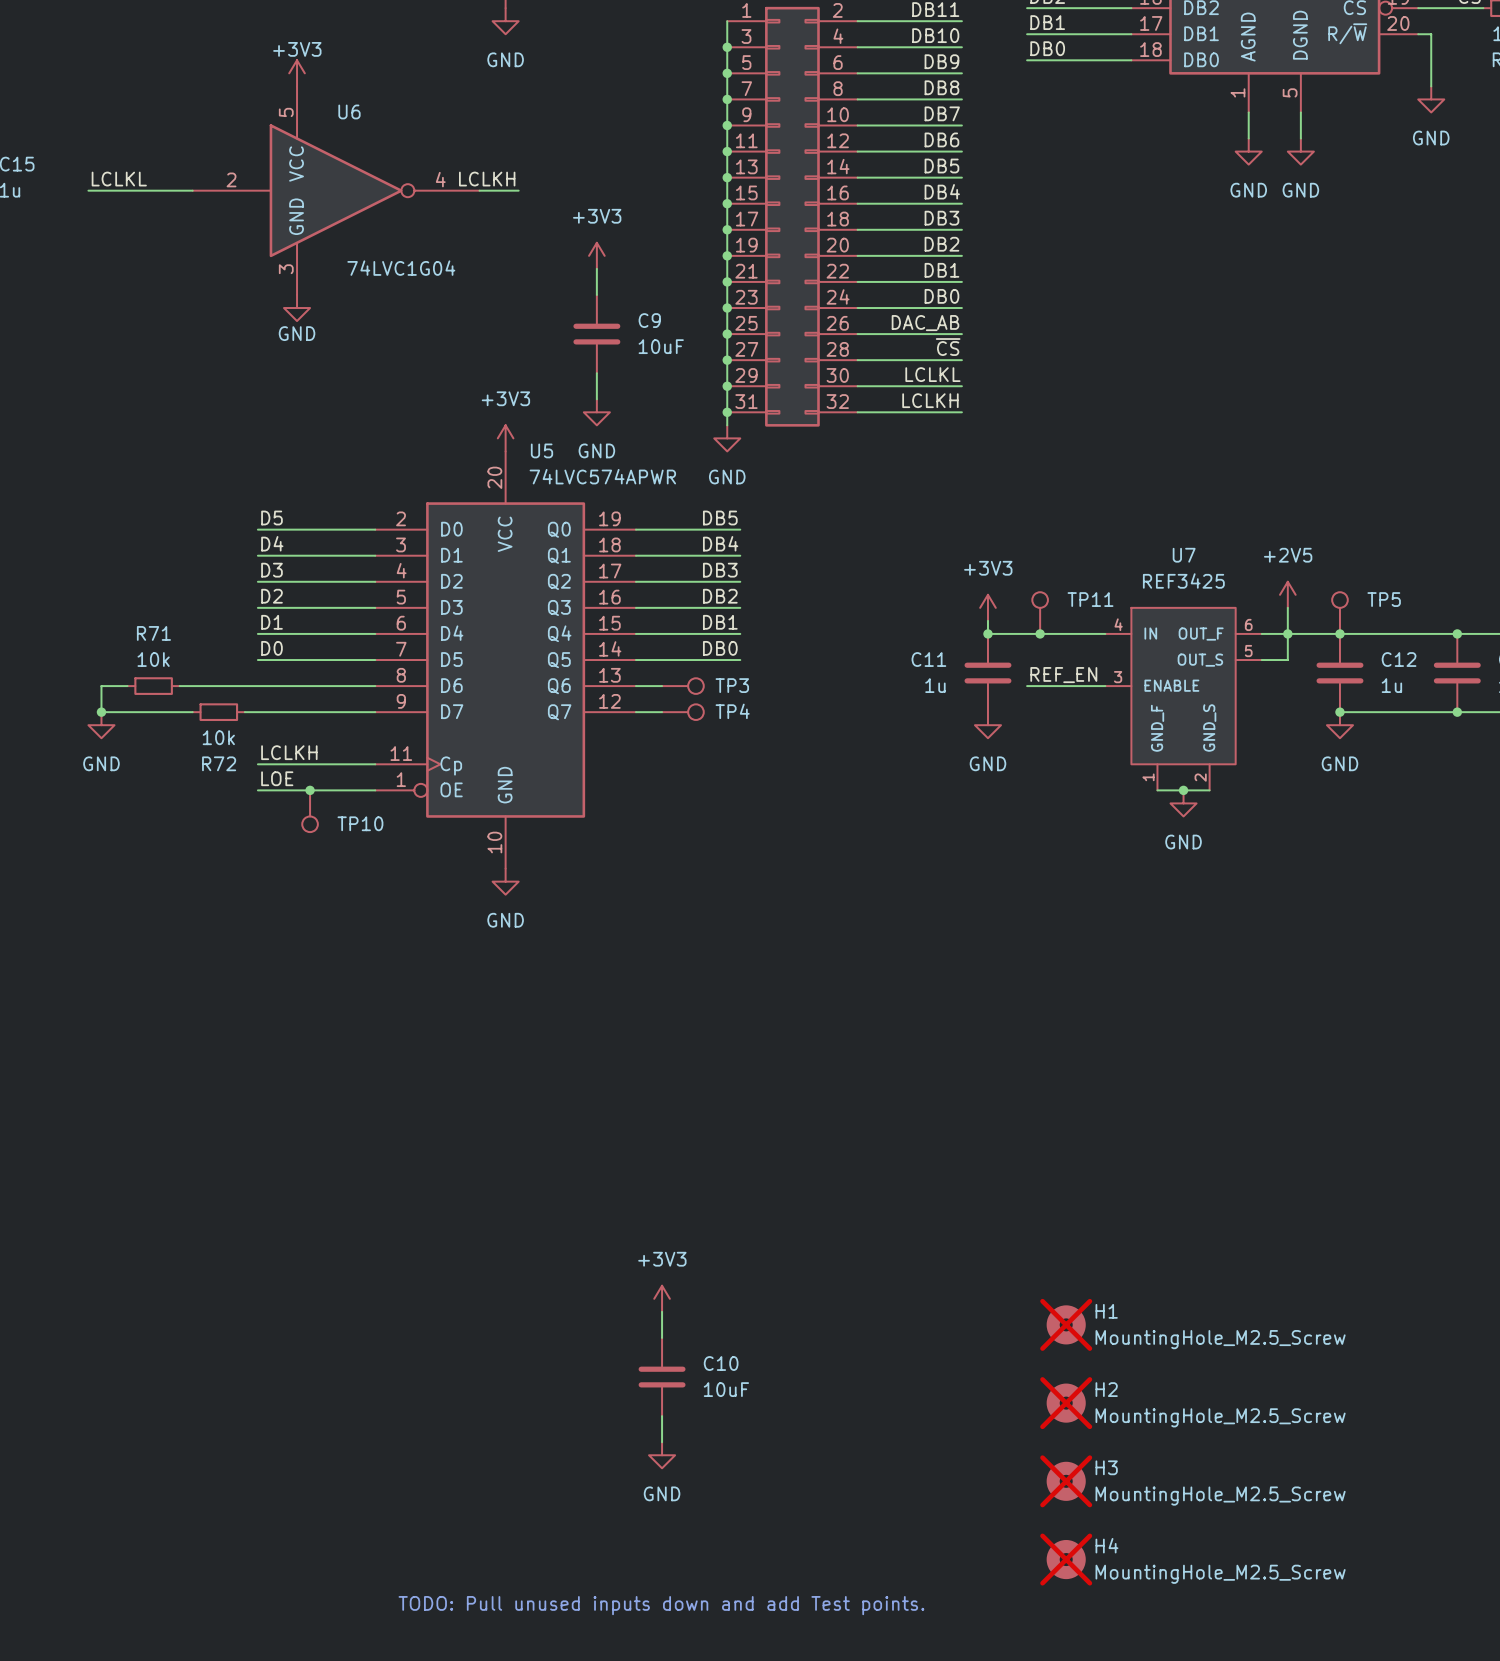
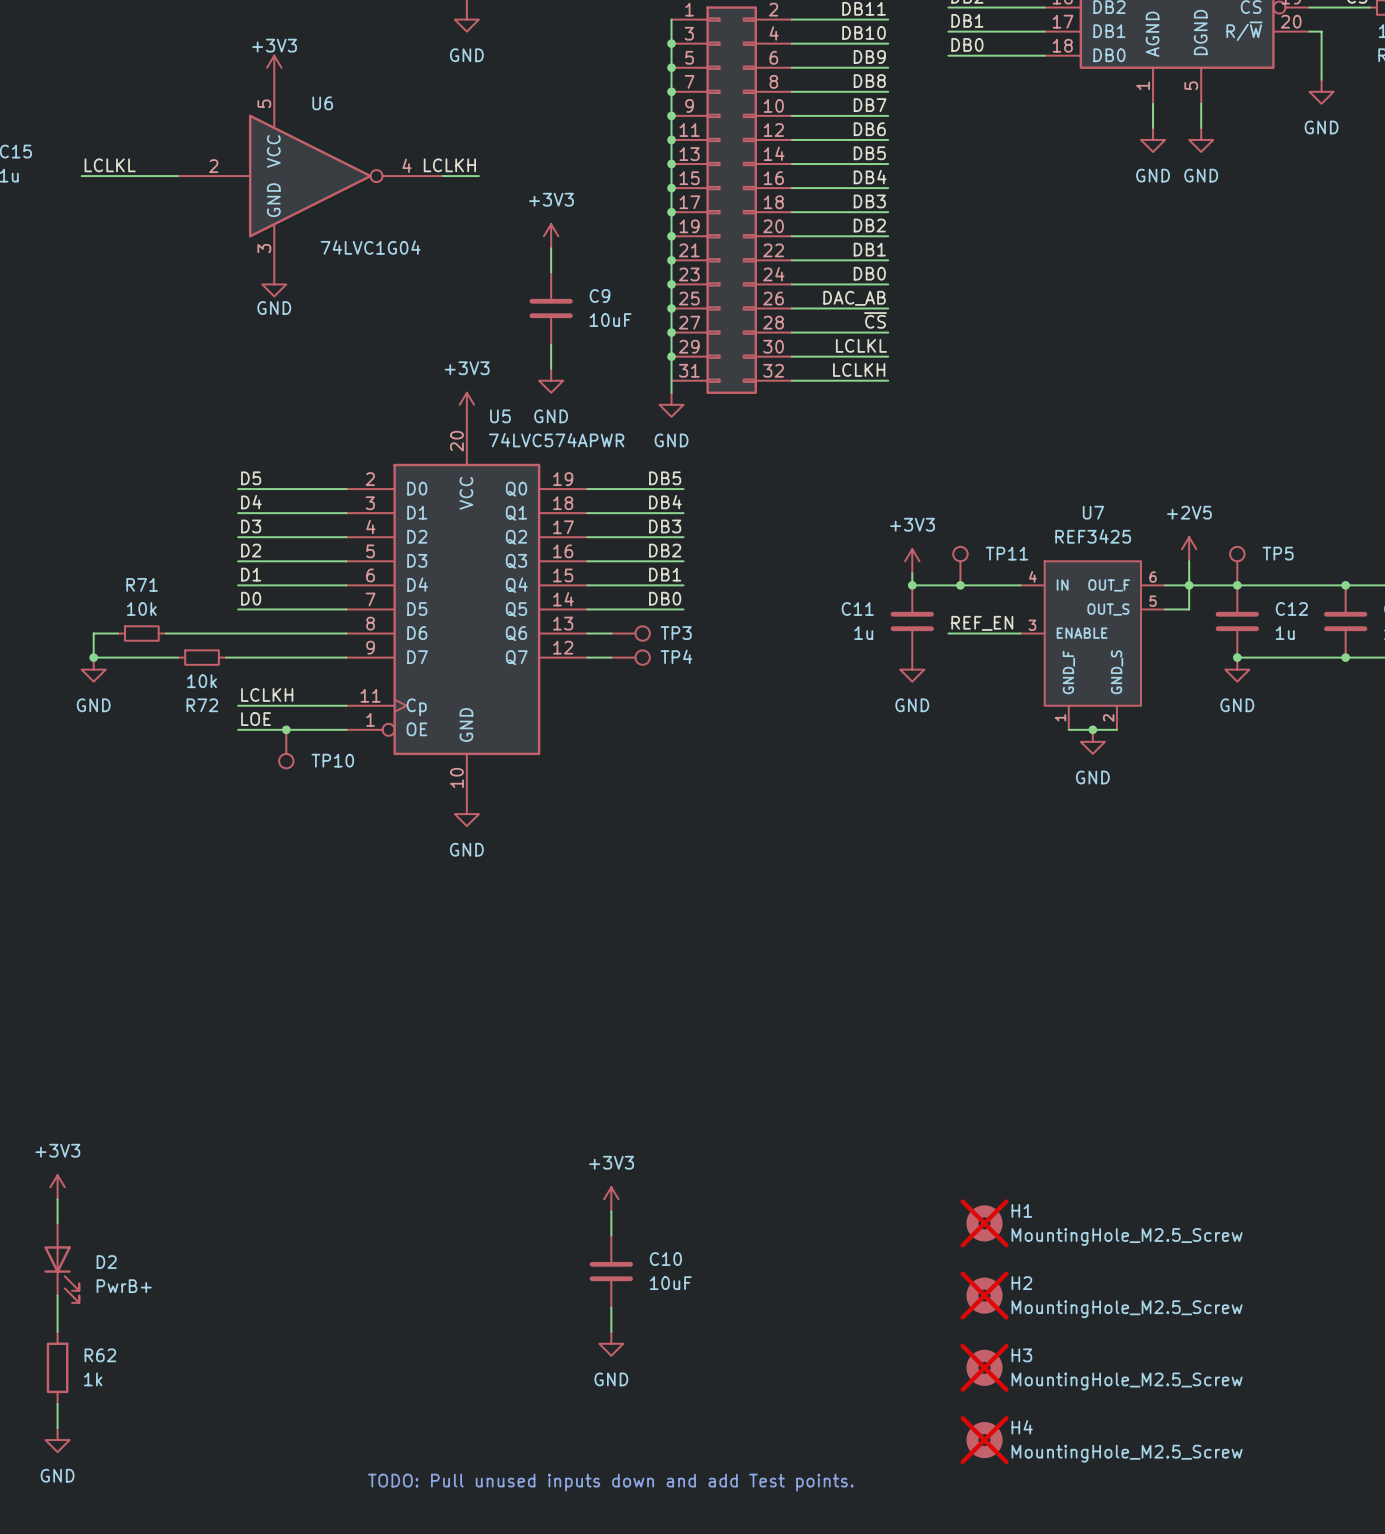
junction: (727, 412) -> none
power symbol: none -> +3V3 (57, 1187)
wire: none -> (57, 1199) (57, 1223)
D2: none -> PwrB+ (61, 1263)
wire: none -> (57, 1295) (57, 1331)
R62: none -> 1k (57, 1367)
wire: none -> (57, 1403) (57, 1428)
power symbol: none -> GND (57, 1440)

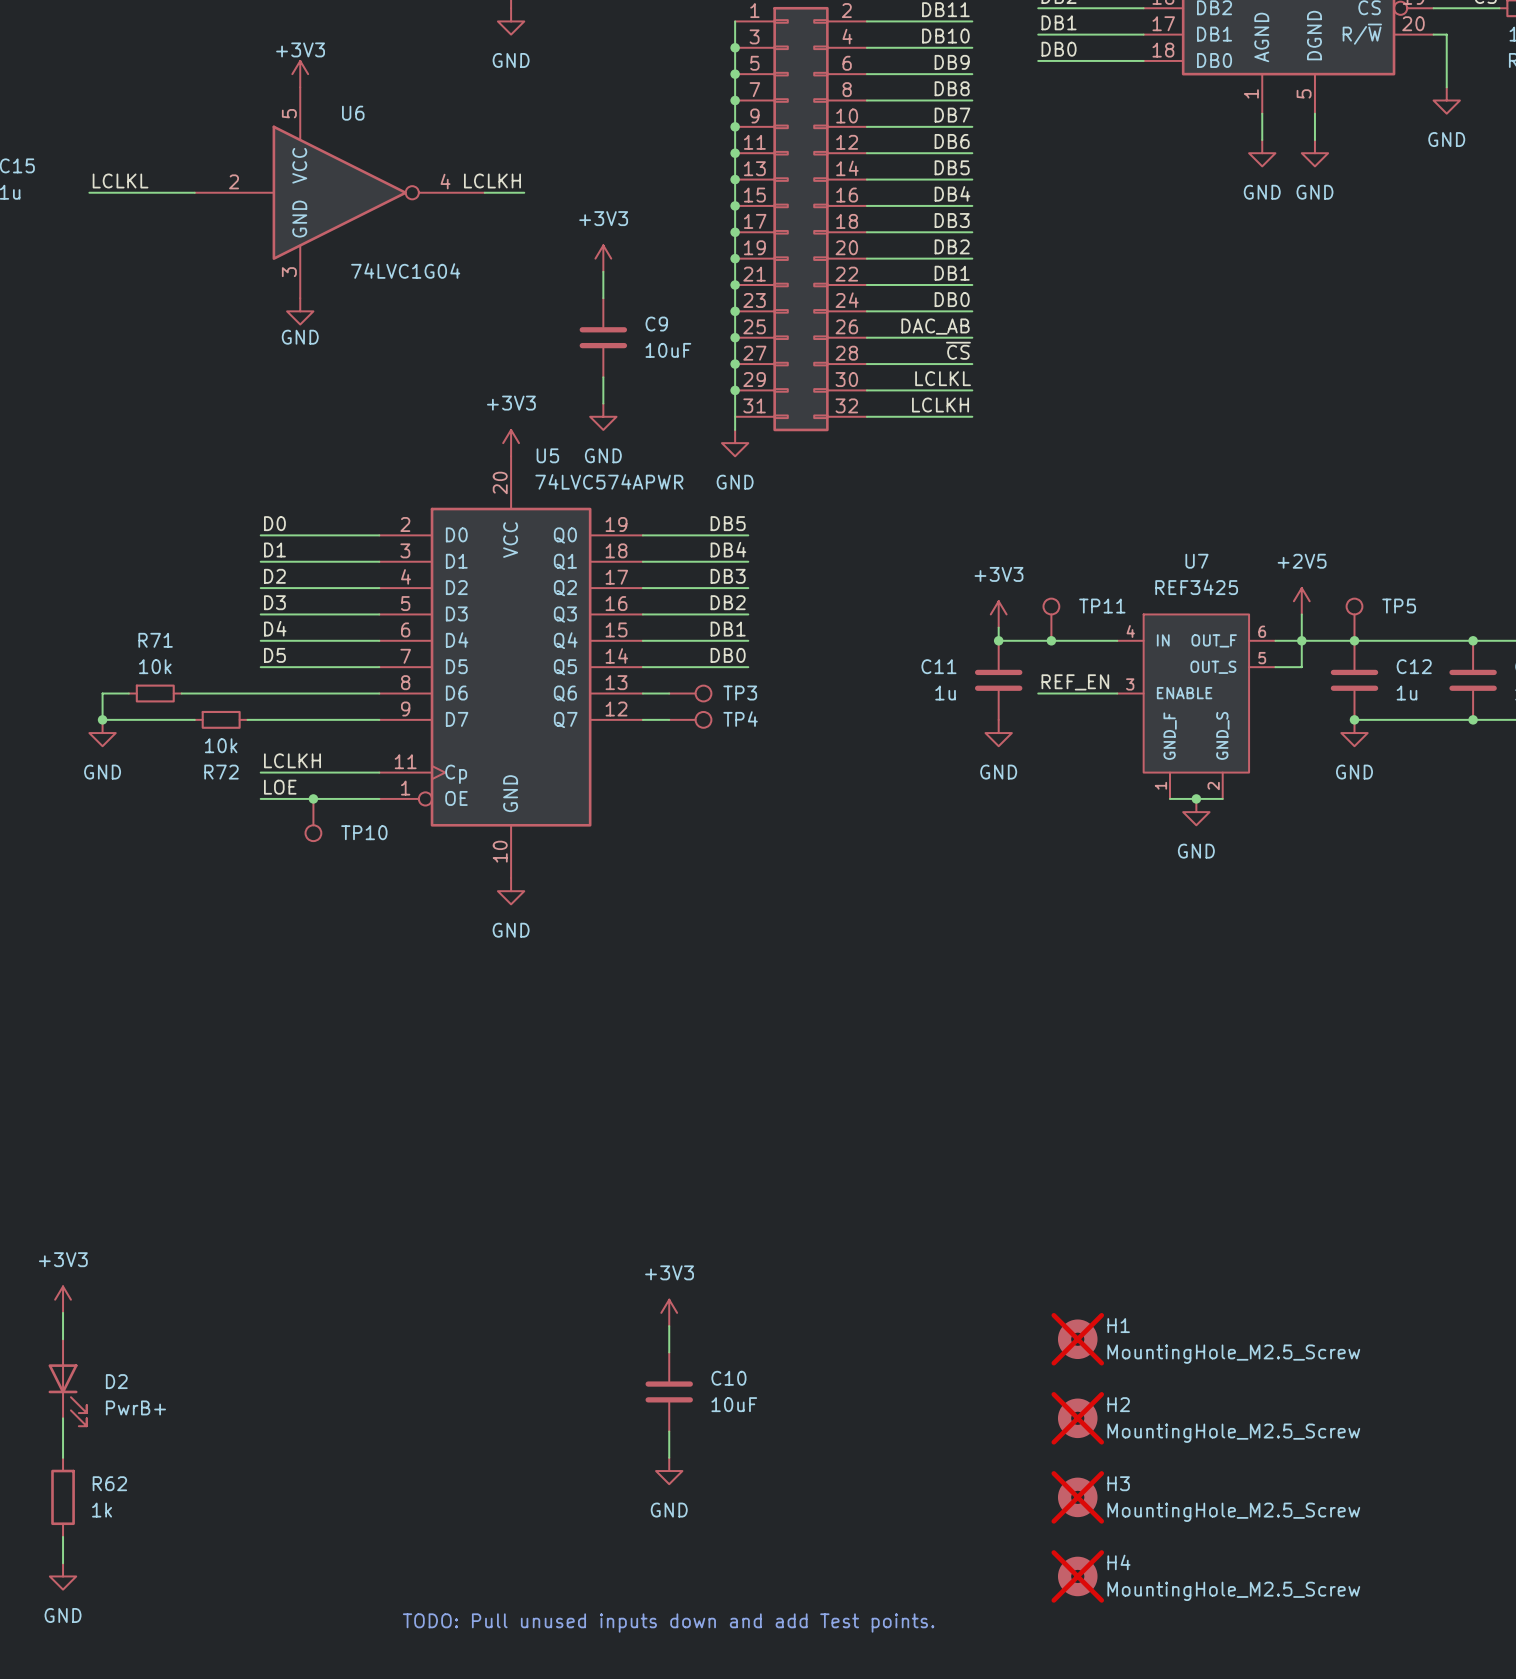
label: D5 (251, 478) -> D0 (274, 523)
label: D4 (251, 502) -> D1 (274, 549)
label: D3 (251, 526) -> D2 (274, 576)
label: D2 (251, 550) -> D3 (274, 602)
label: D1 (251, 574) -> D4 (275, 628)
label: D0 (251, 598) -> D5 (274, 655)

